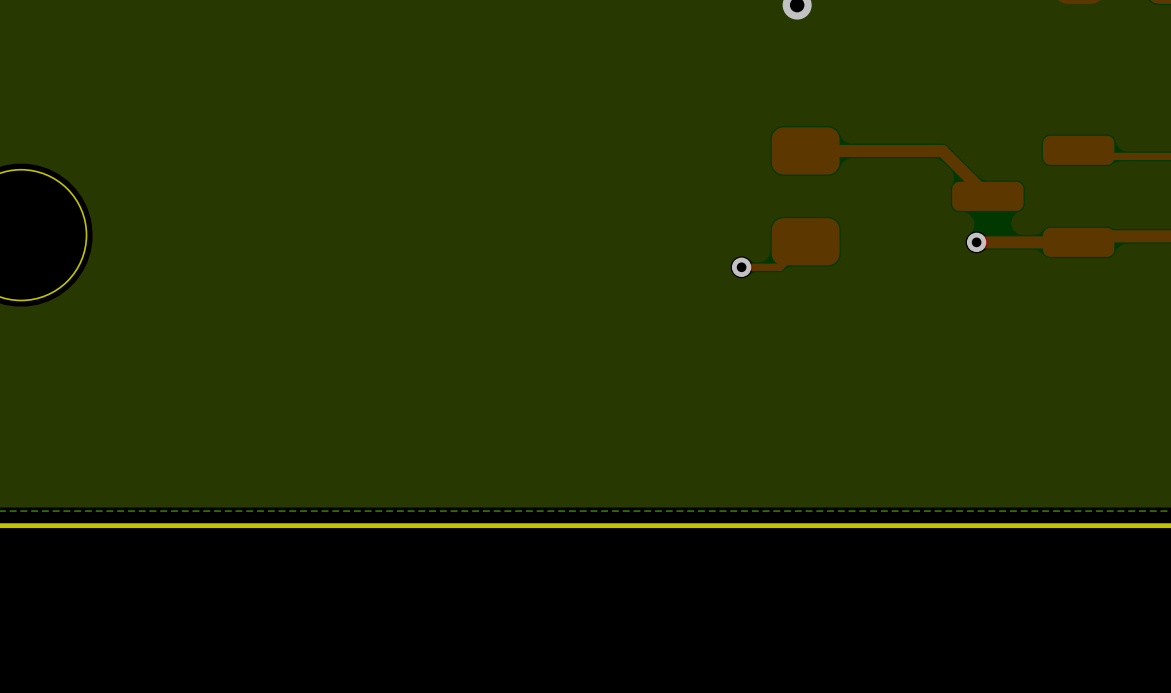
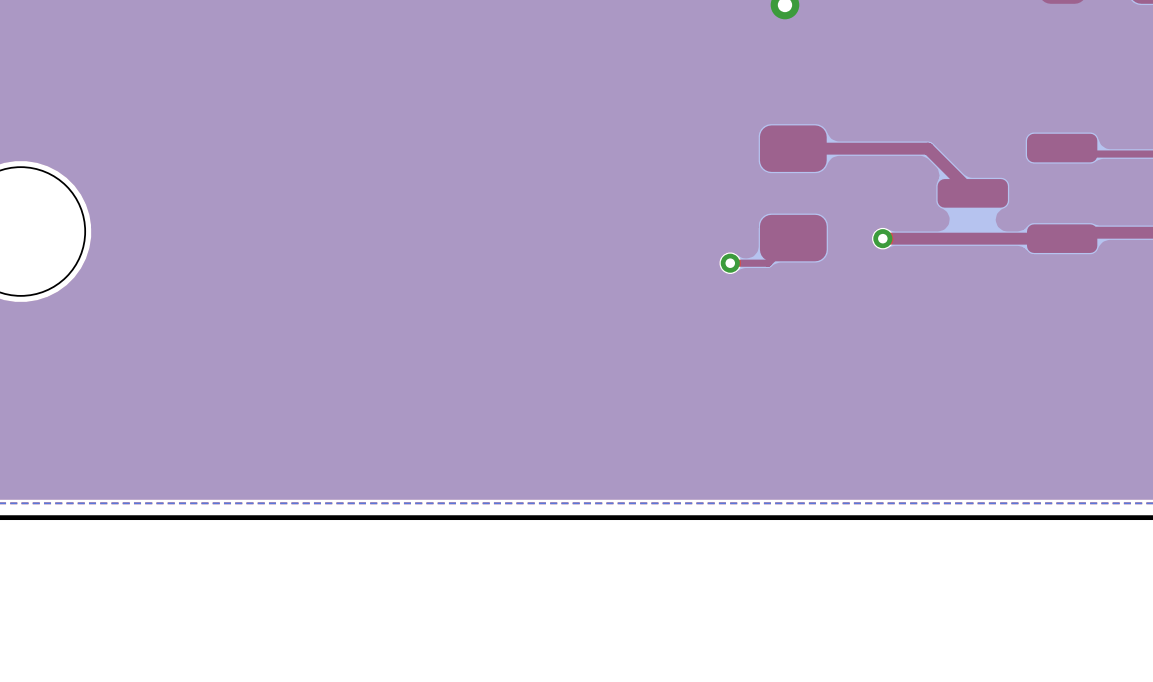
top track: none -> (961, 238) (882, 238)
via position: (976, 242) -> (882, 238)

